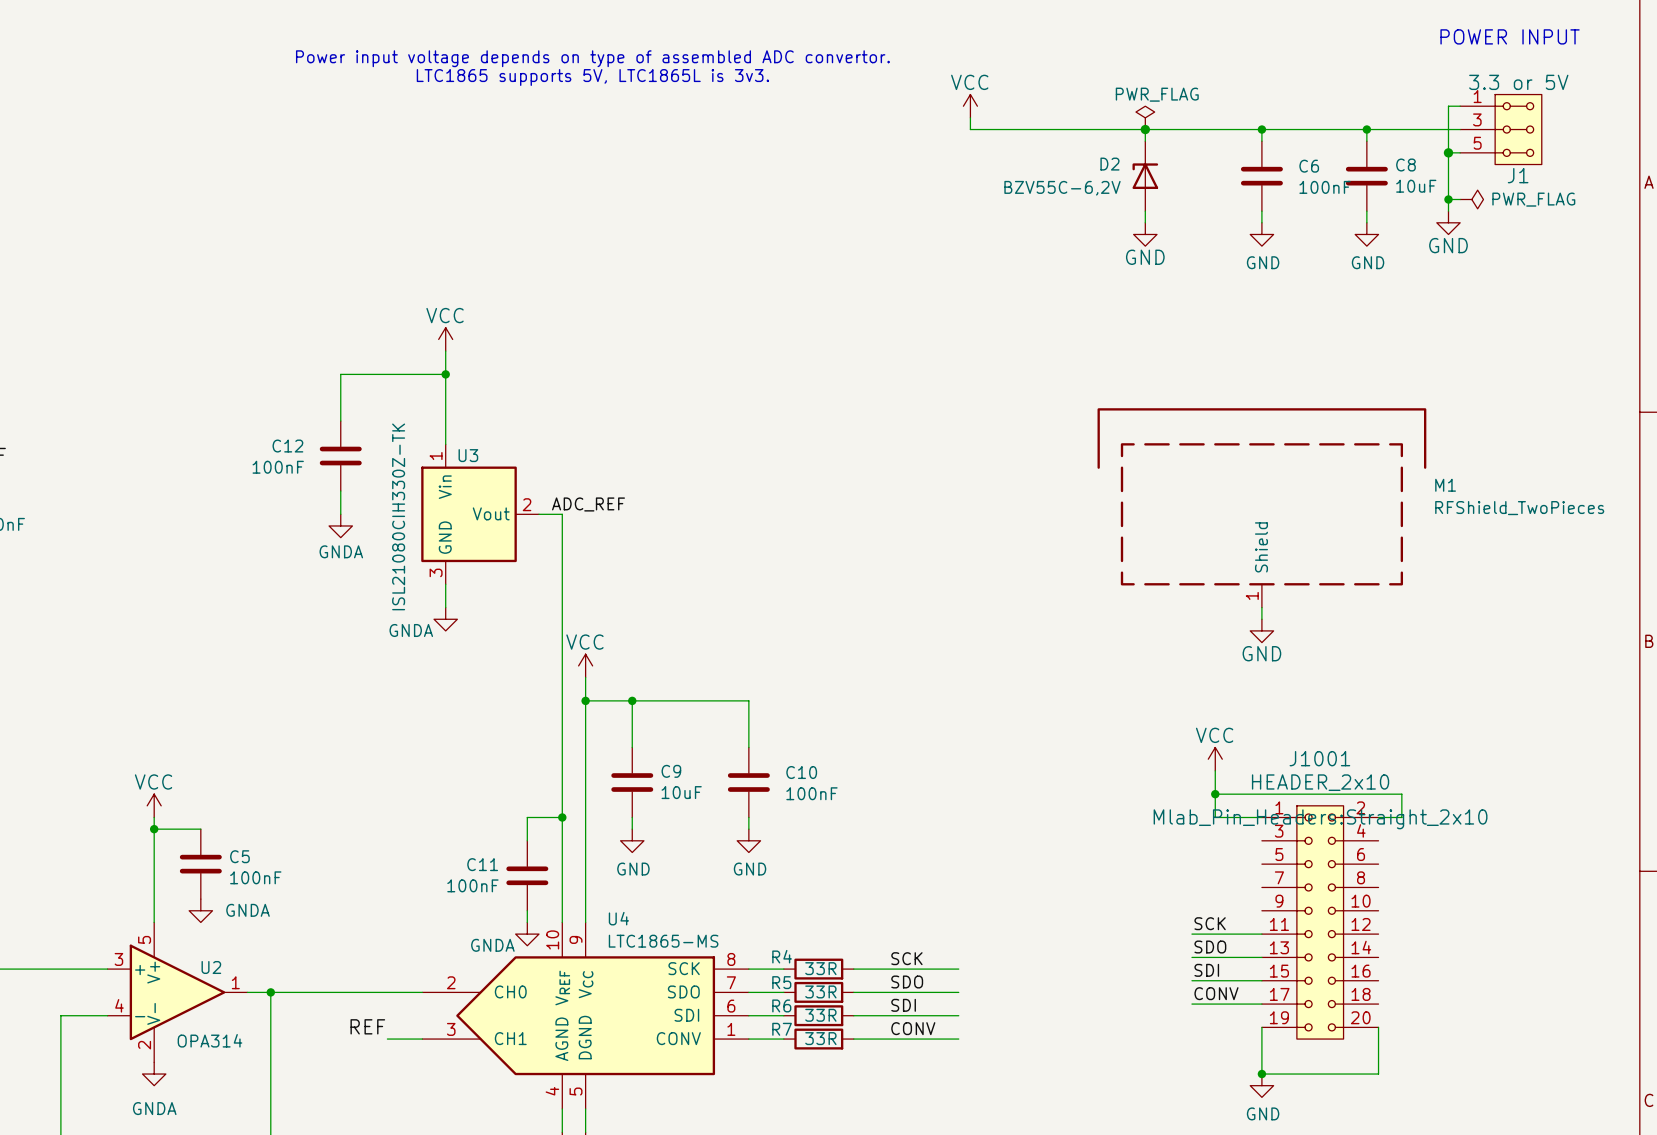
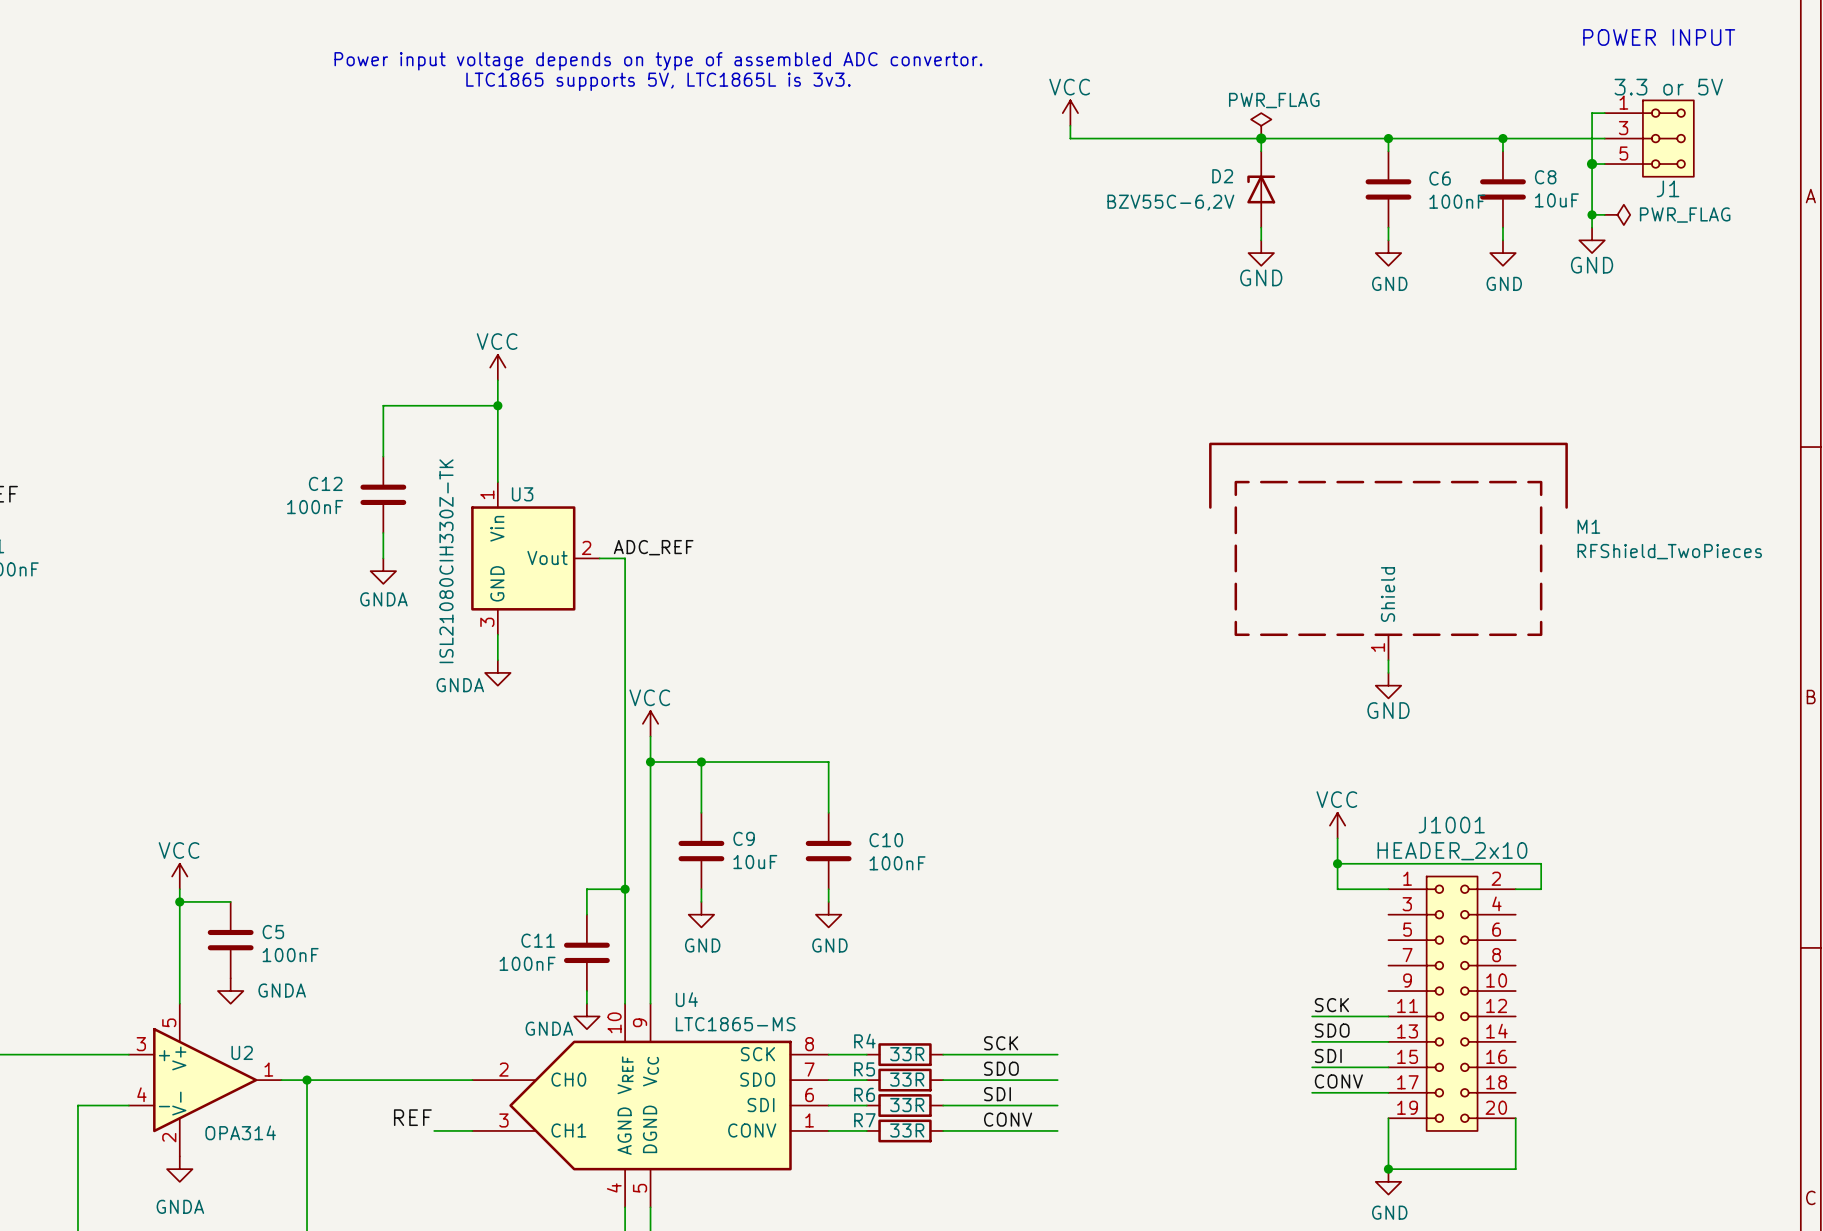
J1001 text: Mlab_Pin_Headers:Straight_2x10 (1320, 819) -> none

